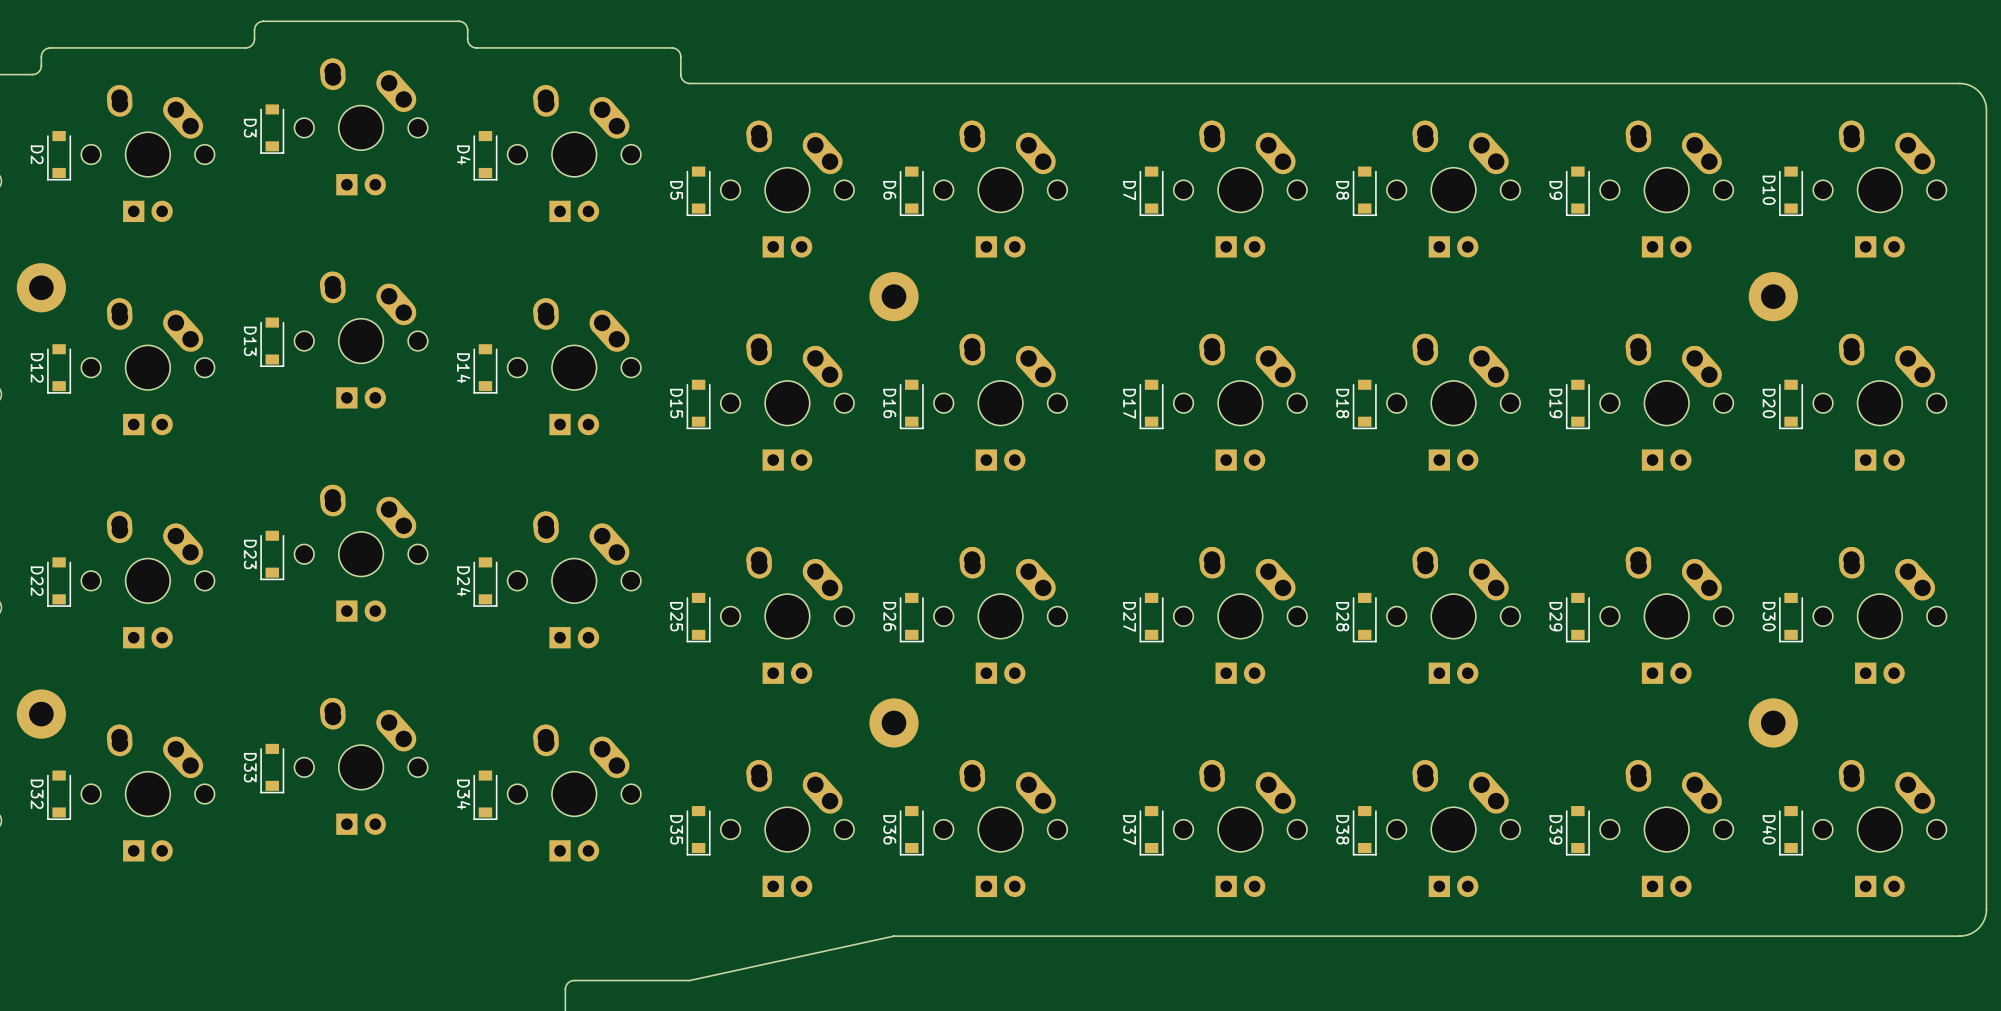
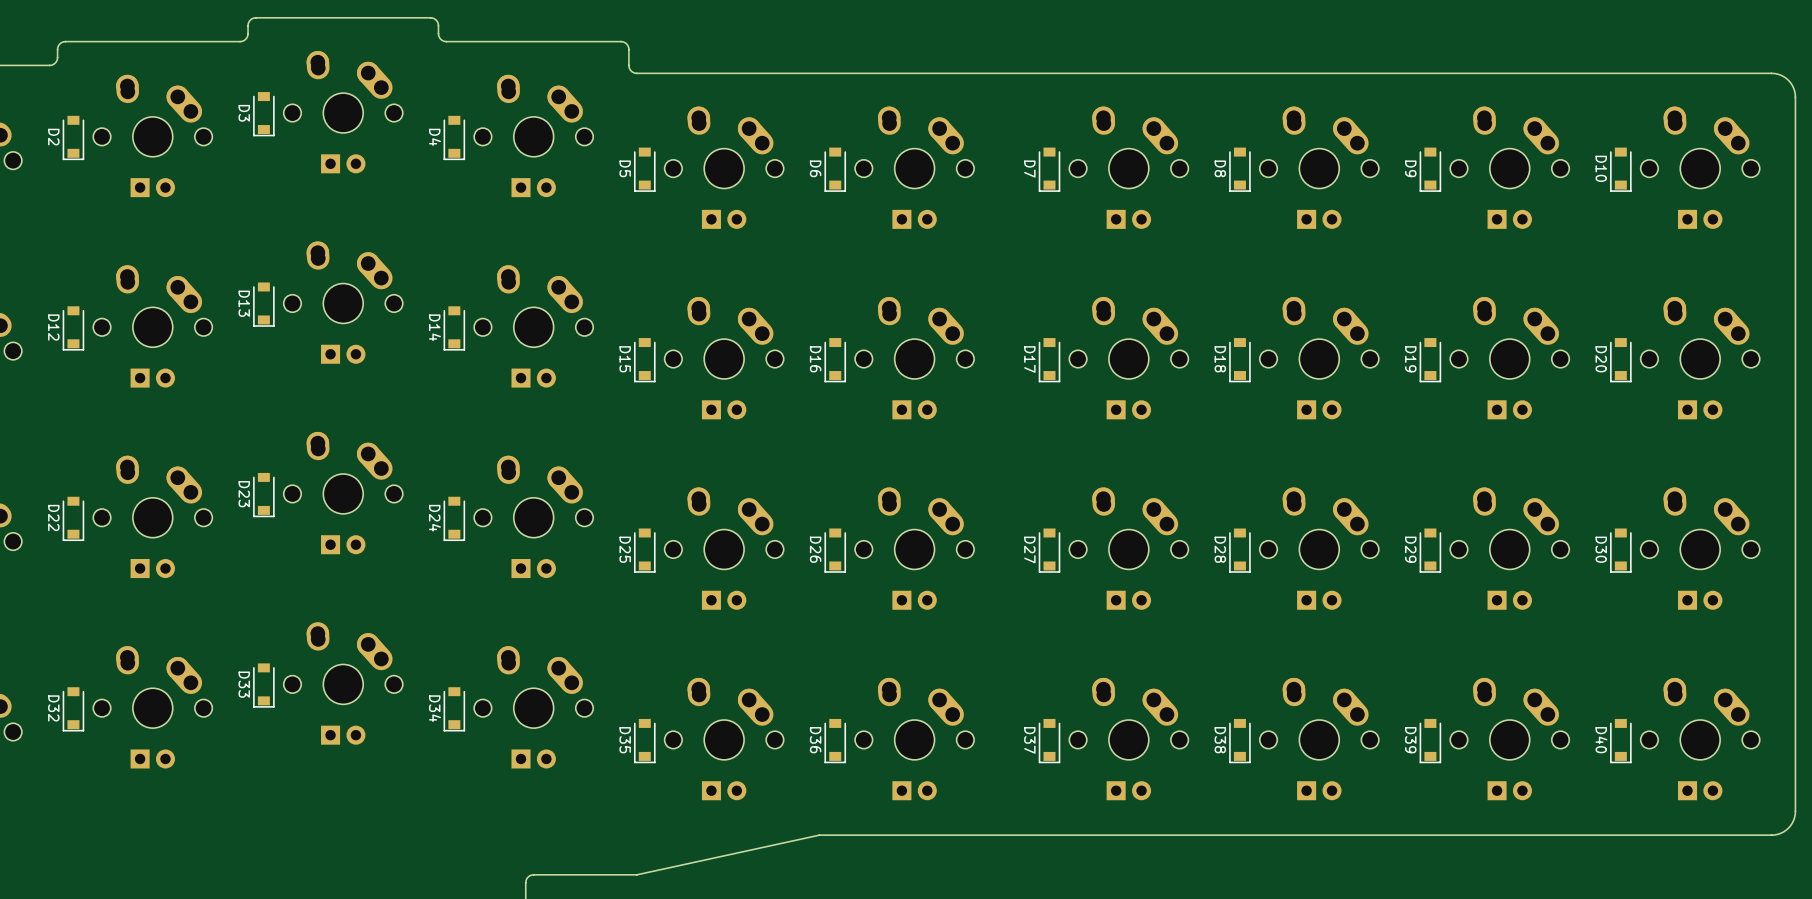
part: (41, 287) -> none
part: (894, 296) -> none
part: (1773, 296) -> none
part: (41, 714) -> none
part: (894, 722) -> none
part: (1773, 722) -> none

